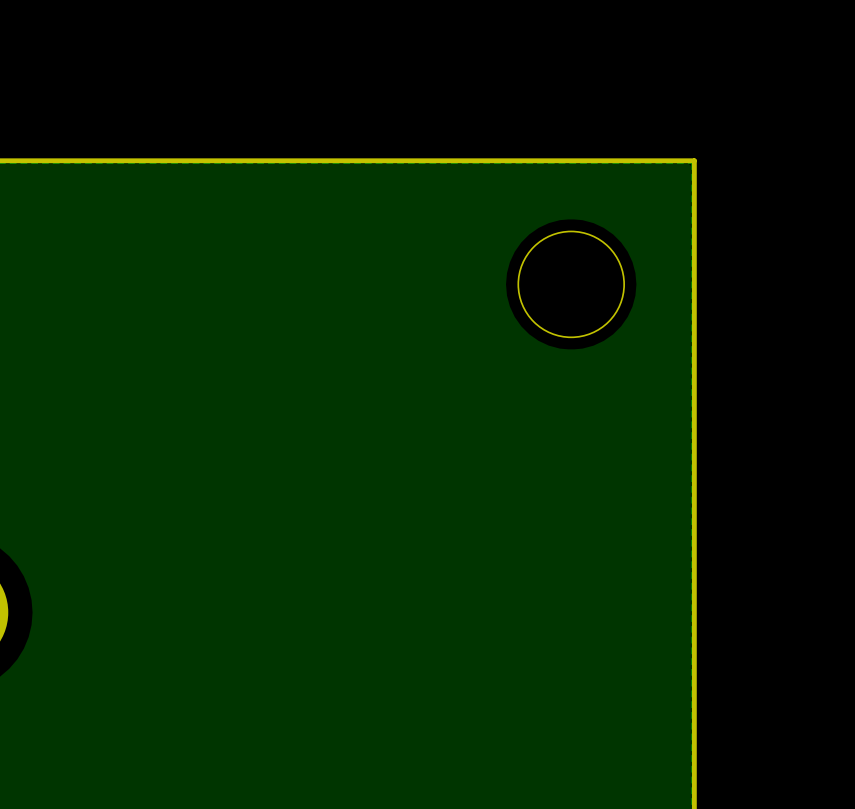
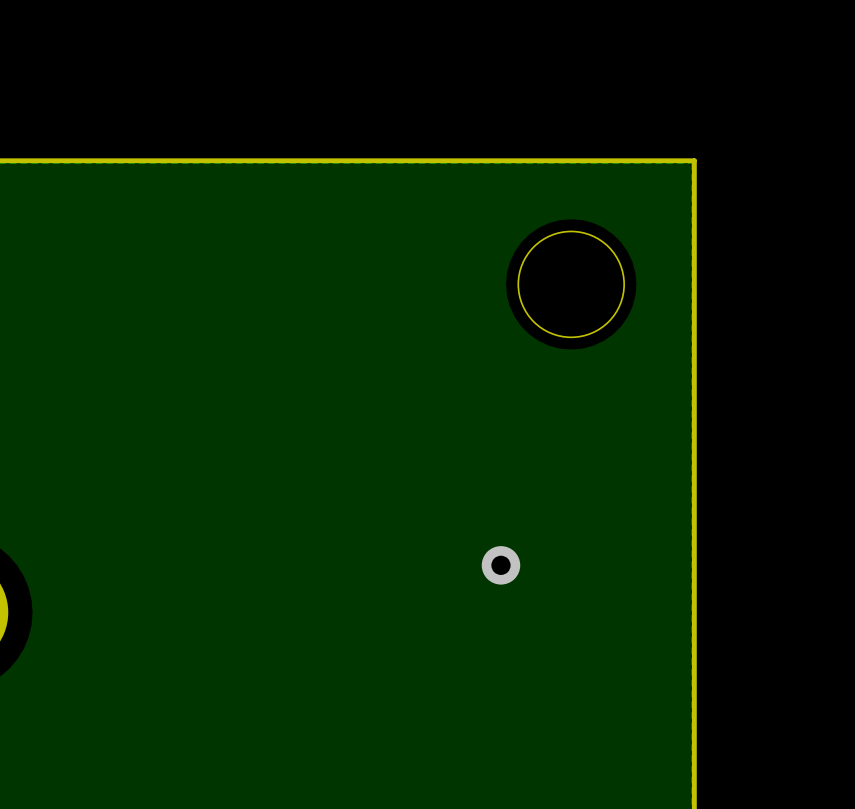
via: none -> (500, 565)

